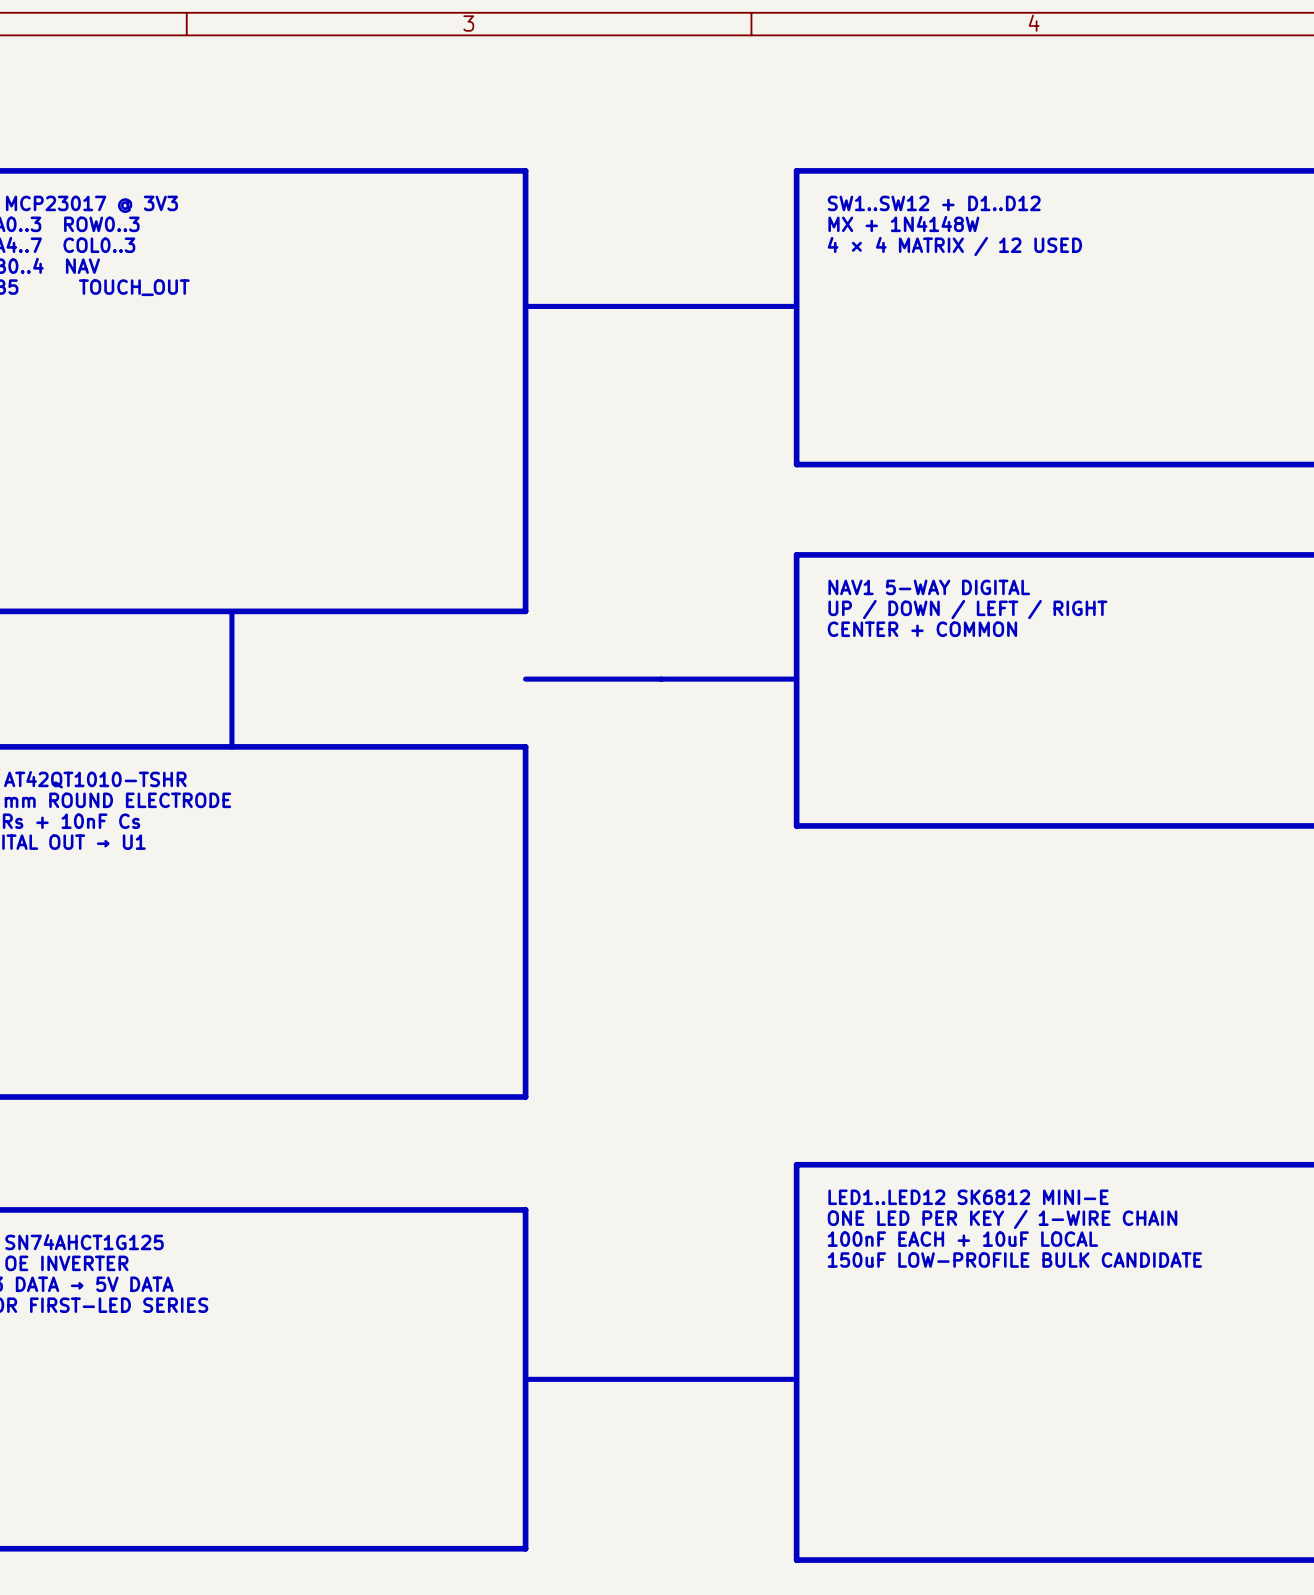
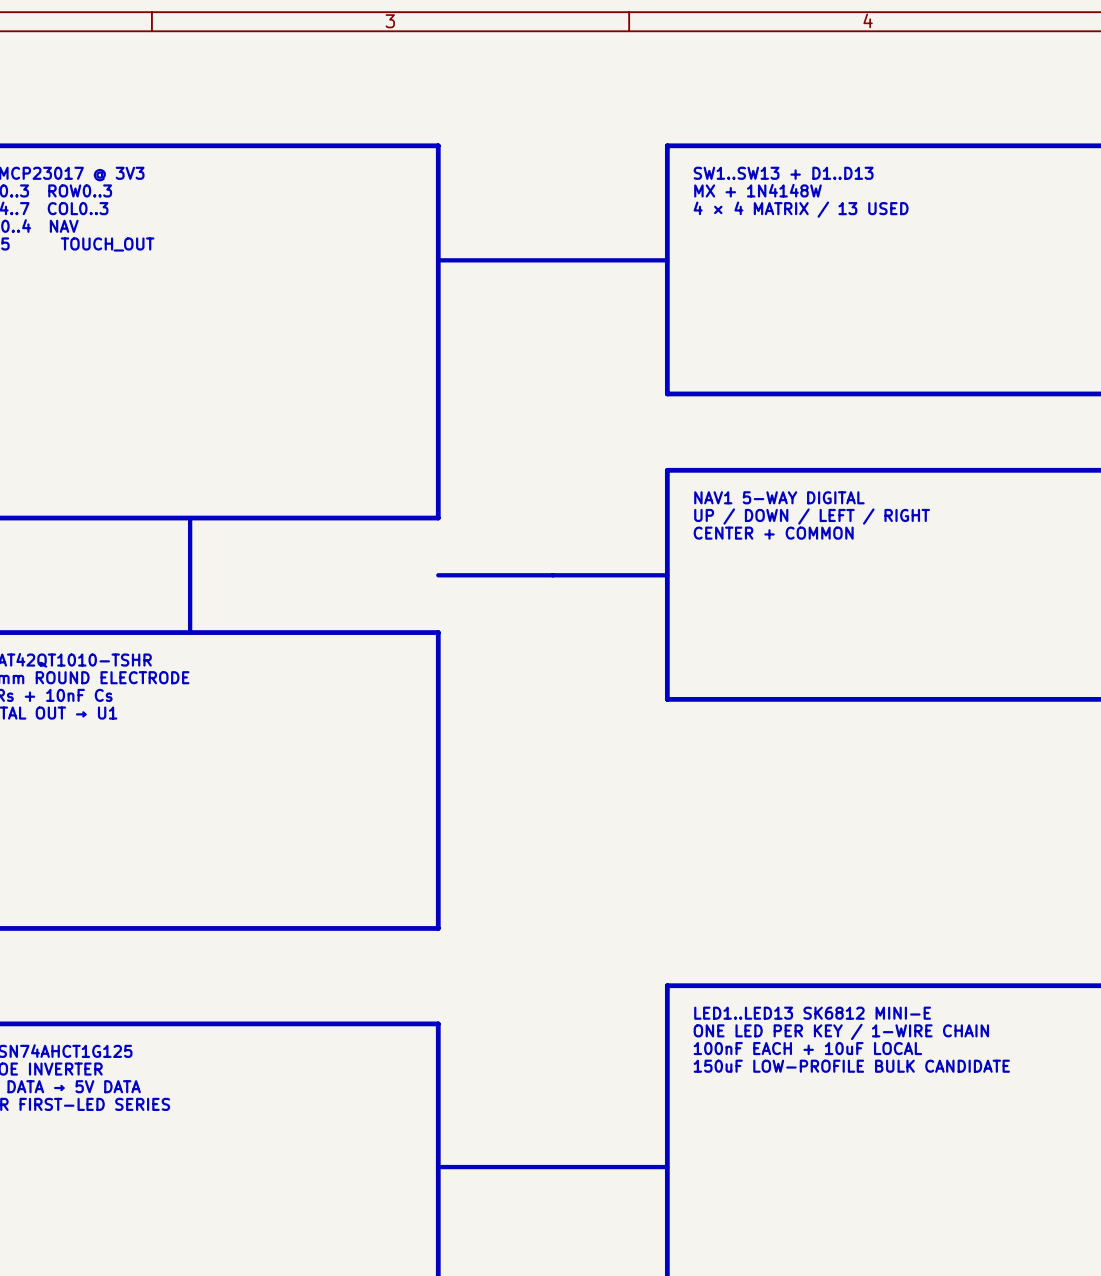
text: SW1..SW12 + D1..D12 (934, 203) -> SW1..SW13 + D1..D13 (783, 173)
text: 4 × 4 MATRIX / 12 USED (954, 246) -> 4 × 4 MATRIX / 13 USED (801, 209)
text: LED1..LED12 SK6812 MINI-E (968, 1197) -> LED1..LED13 SK6812 MINI-E (812, 1013)

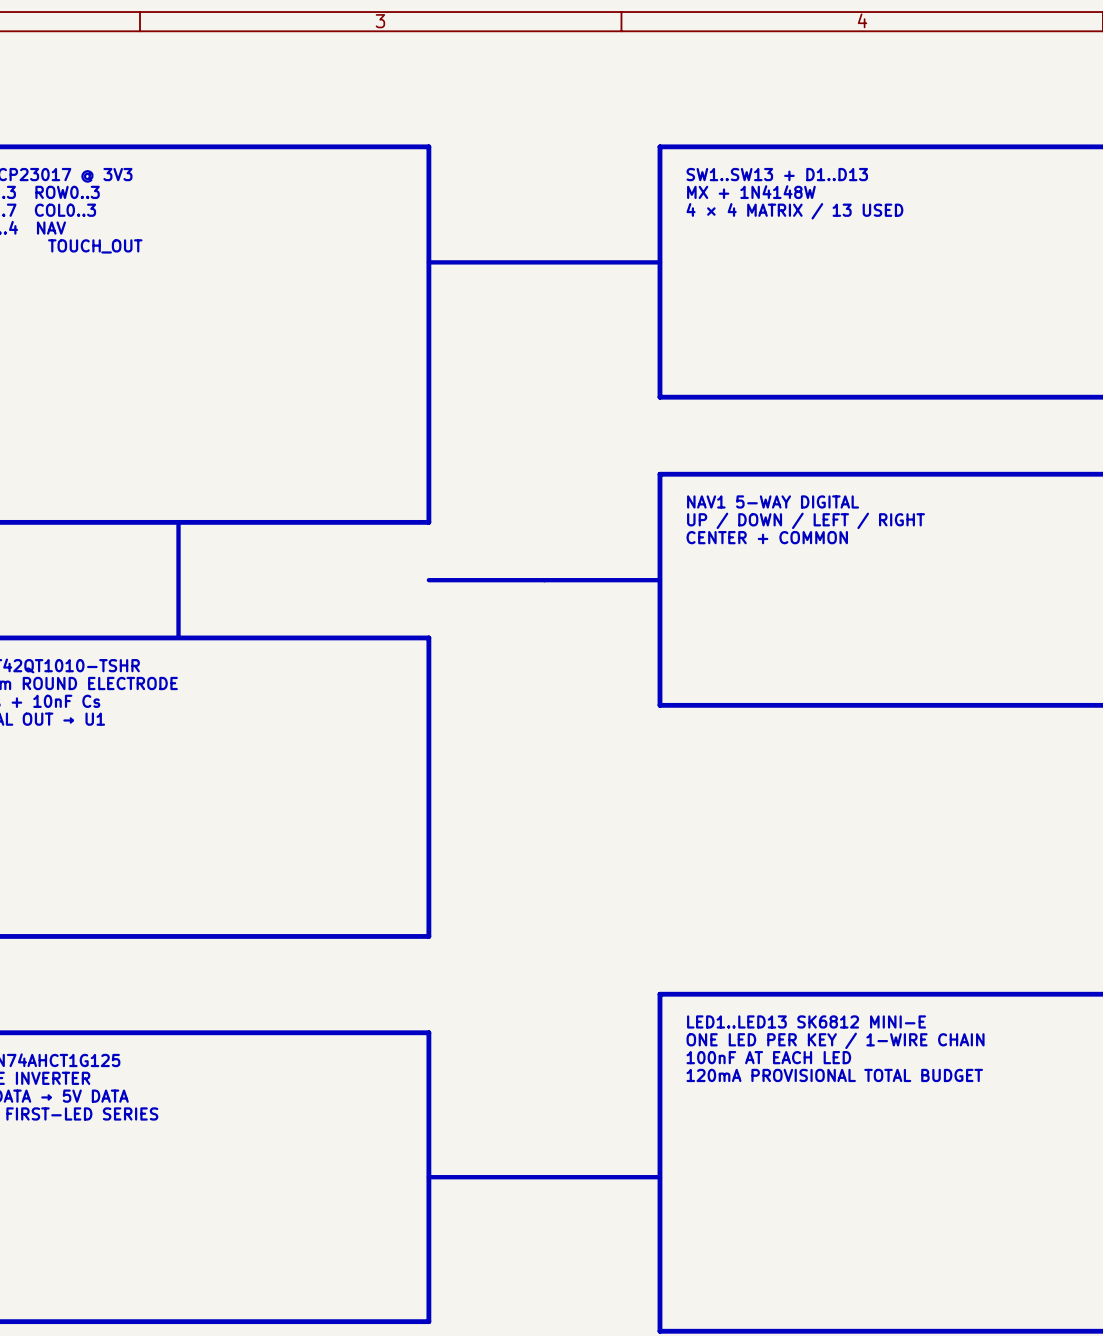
text: 100nF EACH + 10uF LOCAL (807, 1048) -> 100nF AT EACH LED (768, 1057)
text: 150uF LOW-PROFILE BULK CANDIDATE (851, 1066) -> 120mA PROVISIONAL TOTAL BUDGET (834, 1075)

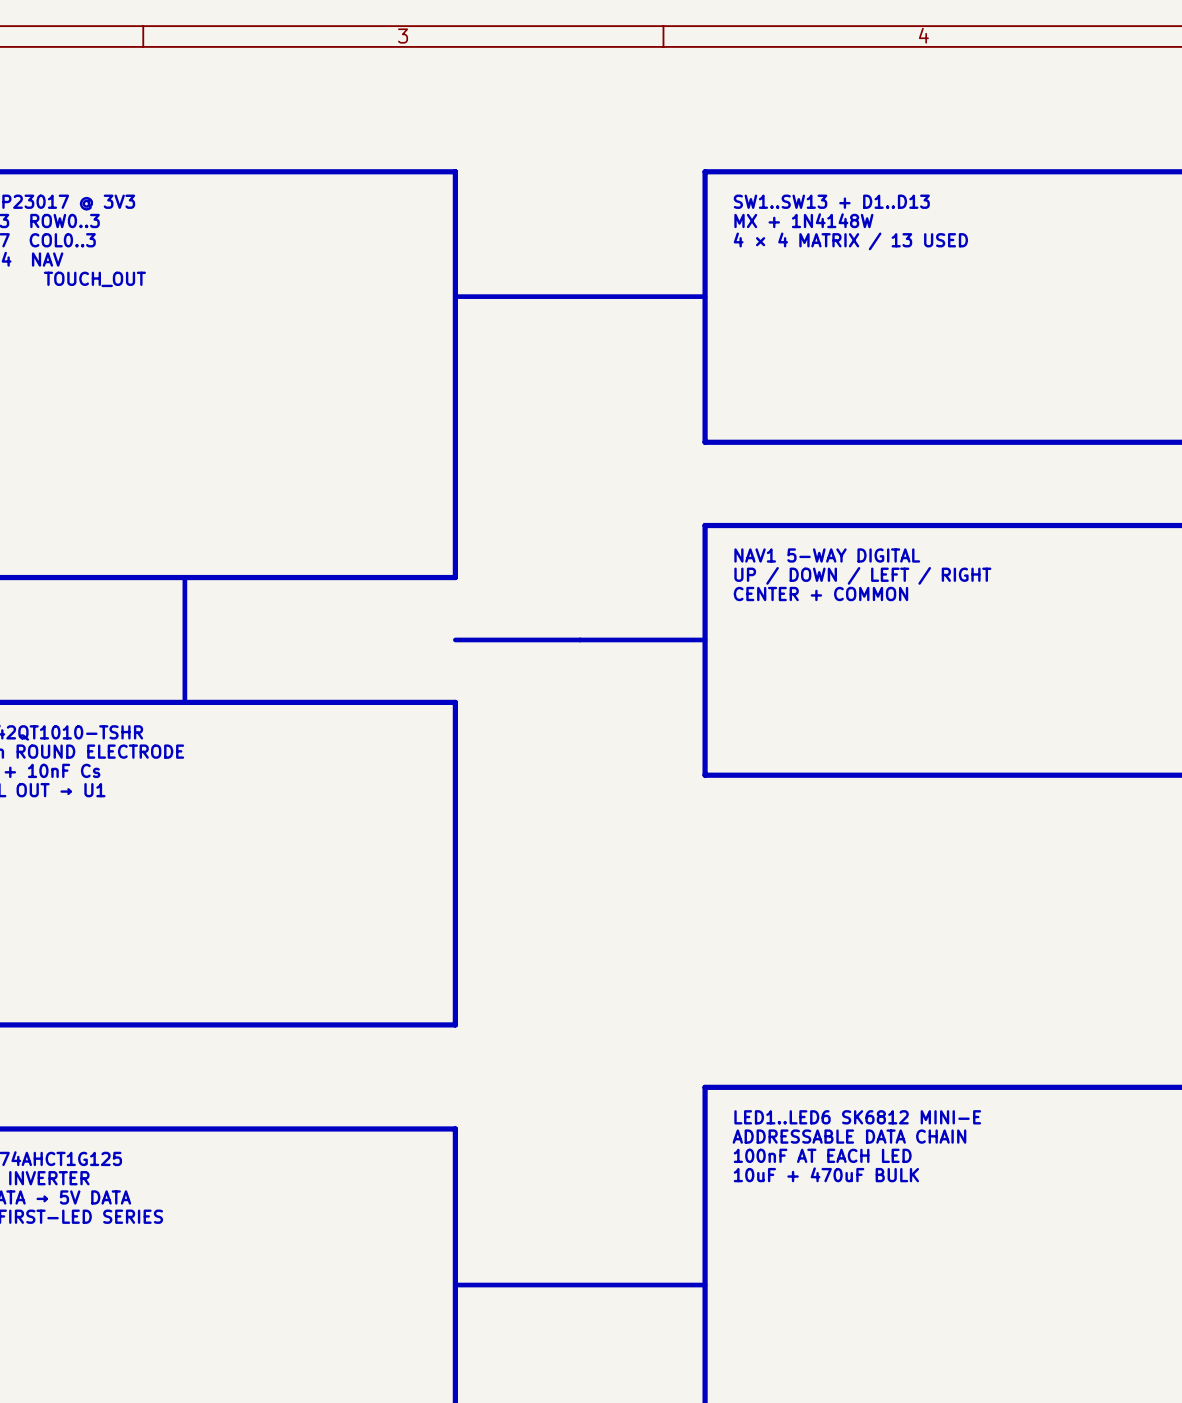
text: LED1..LED13 SK6812 MINI-E (806, 1021) -> LED1..LED6 SK6812 MINI-E (857, 1117)
text: ONE LED PER KEY / 1-WIRE CHAIN (835, 1040) -> ADDRESSABLE DATA CHAIN (849, 1136)
text: 120mA PROVISIONAL TOTAL BUDGET (834, 1075) -> 10uF + 470uF BULK (826, 1174)

